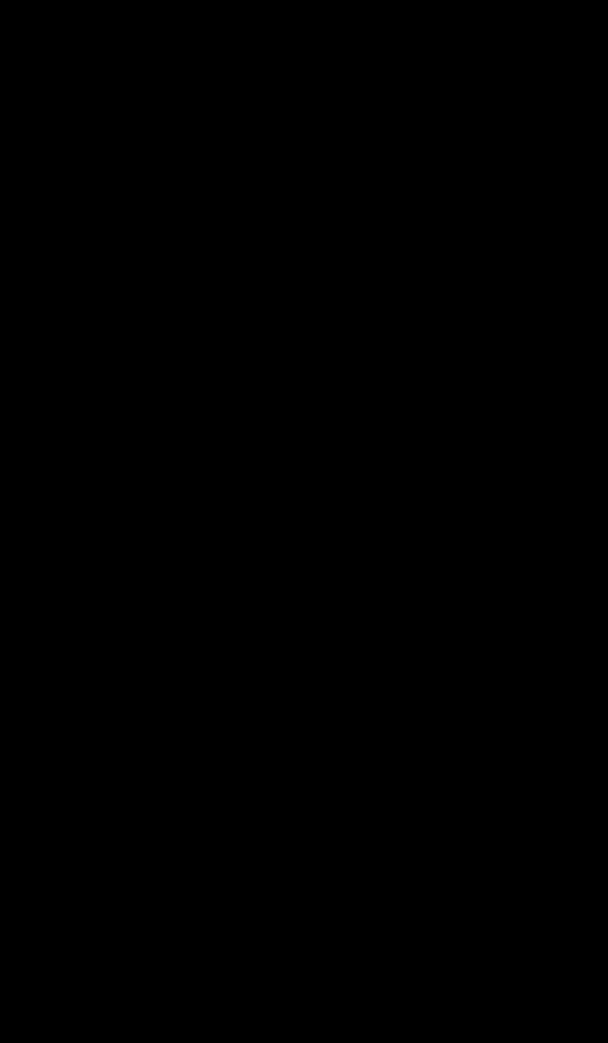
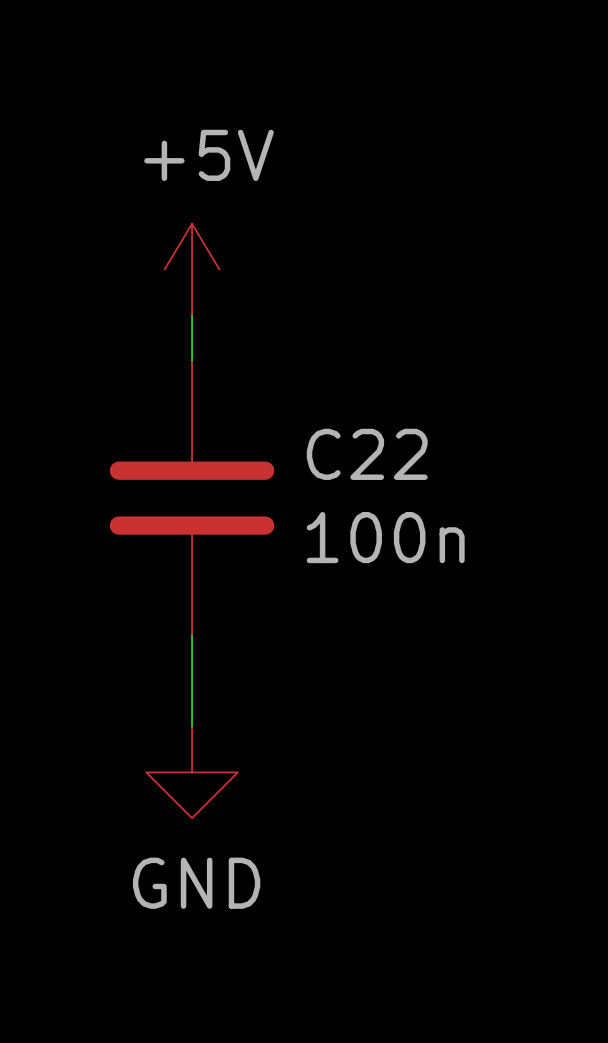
power symbol: none -> +5V (192, 269)
wire: none -> (192, 315) (192, 360)
C22: none -> 100n (192, 498)
wire: none -> (192, 635) (192, 726)
power symbol: none -> GND (192, 772)

